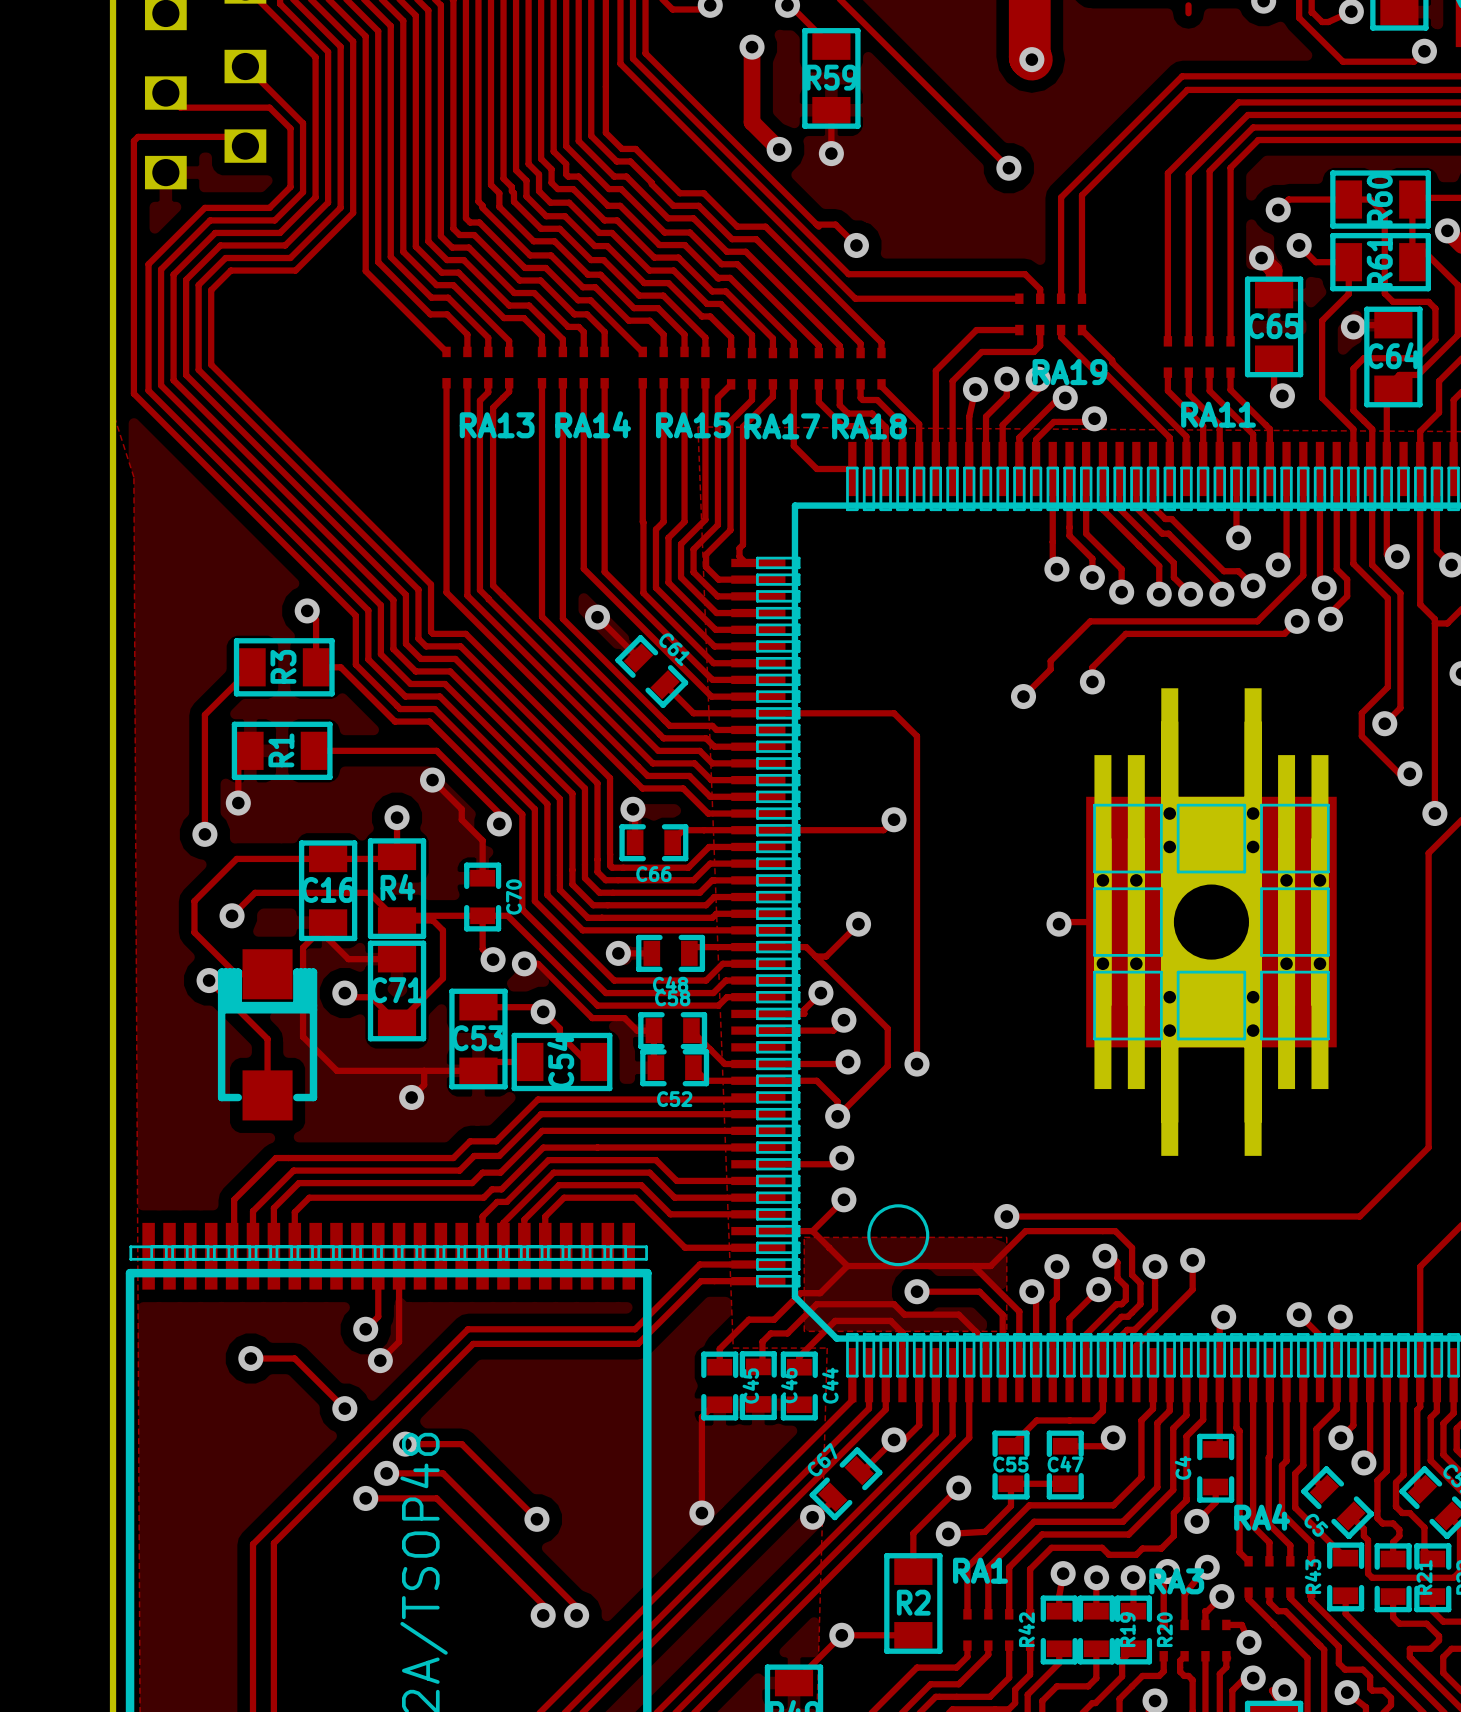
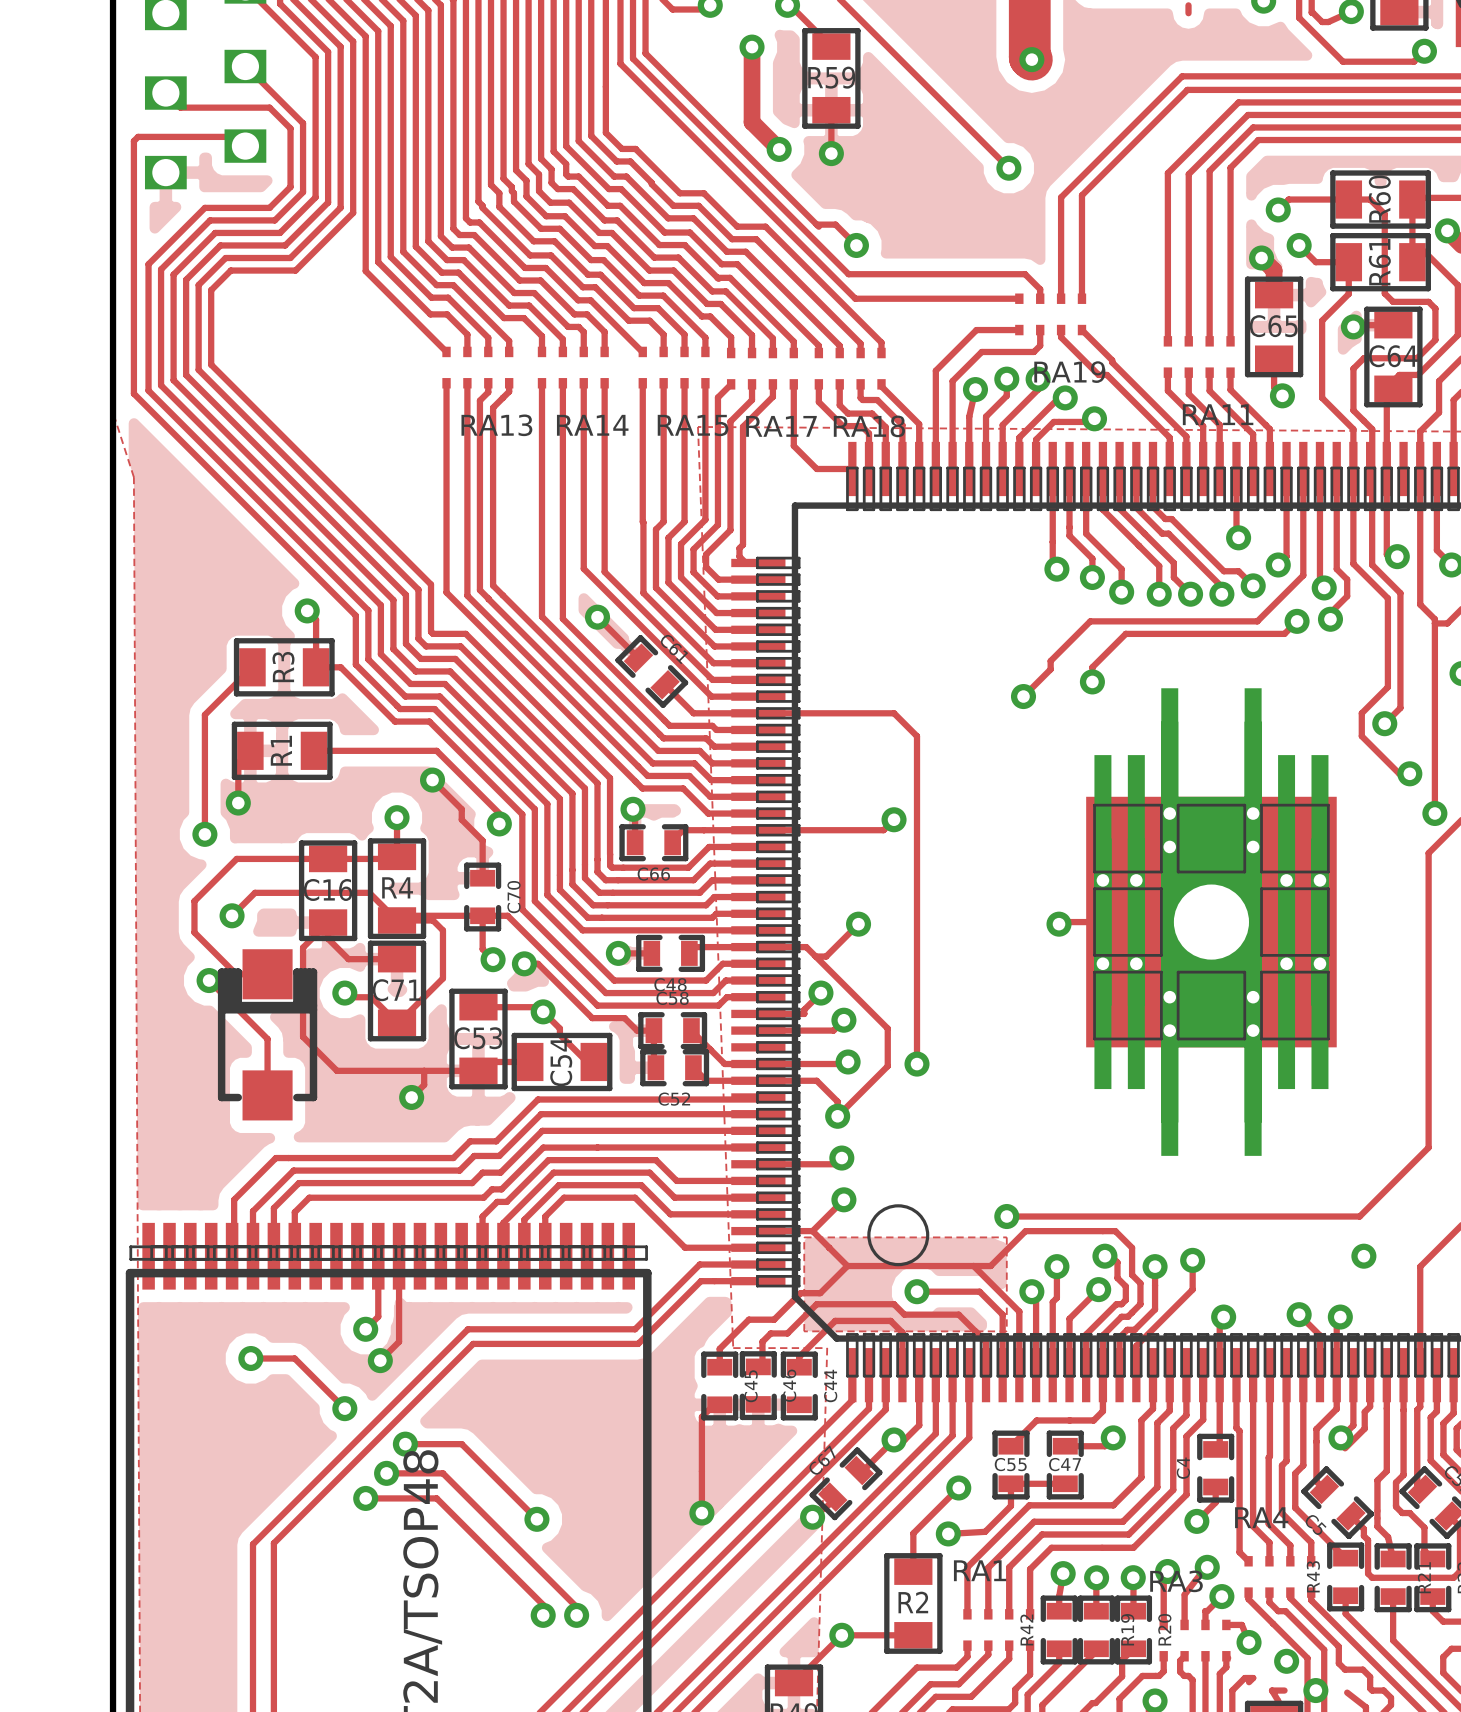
via: none -> (1363, 1256)
track: (1370, 1406) (1370, 1456) (1363, 1462) -> (1370, 1406) (1364, 1411) (1364, 1428) (1345, 1448)
via: (1363, 1462) -> none
track: (1186, 1494) (1186, 1500) (1173, 1513) (1173, 1536) (1161, 1548) (1142, 1548) (1136, 1554) (1109, 1554) (1102, 1547) -> (1186, 1494) (1133, 1547) (1102, 1547)
track: (1377, 1518) (1382, 1523) (1393, 1523) (1399, 1529) (1399, 1536) (1393, 1542) (1393, 1559) -> (1377, 1518) (1377, 1526) (1388, 1537) (1393, 1559)
track: (1393, 1617) (1399, 1623) (1426, 1623) (1439, 1636) (1439, 1640) (1430, 1648) (1409, 1648) (1409, 1657) -> (1393, 1617) (1393, 1640) (1409, 1657)
track: (1096, 1648) (1096, 1678) (1088, 1686) (1056, 1686) (1042, 1700) (1042, 1705) -> (1096, 1651) (1042, 1705)
track: (1009, 1658) (1009, 1677) (990, 1696) (971, 1696) -> (1009, 1658) (971, 1696)
via: none -> (1286, 1661)
via: (1253, 1678) -> none
via: (1284, 1690) -> none
via: none -> (1315, 1690)
via: (1347, 1692) -> none

